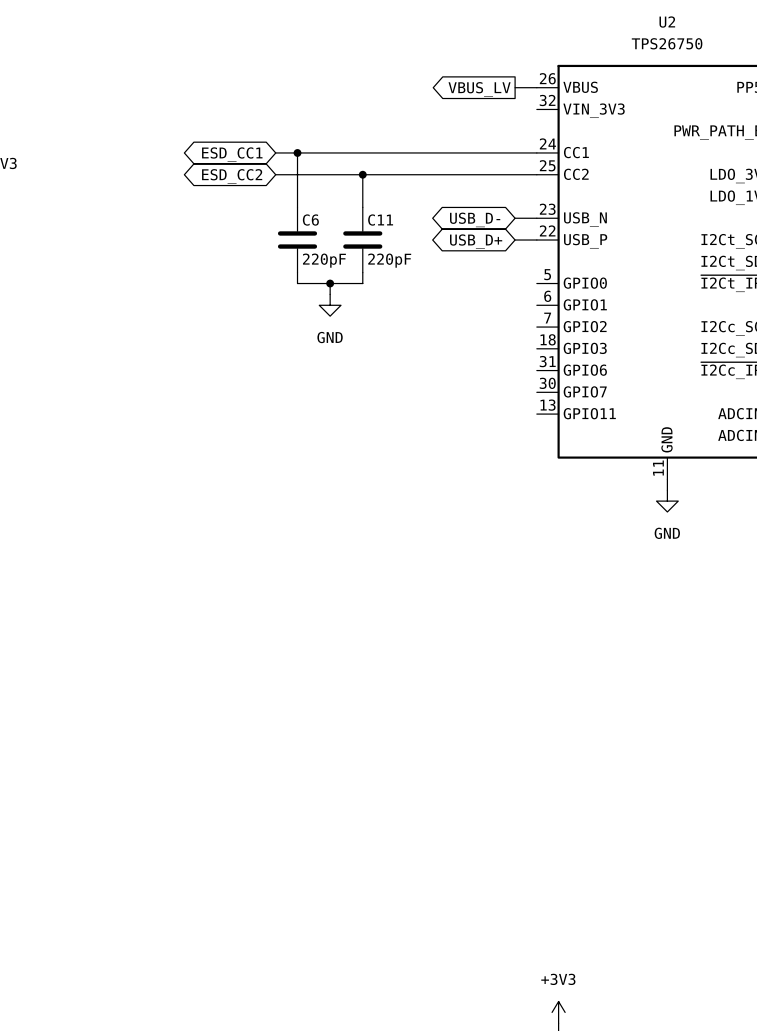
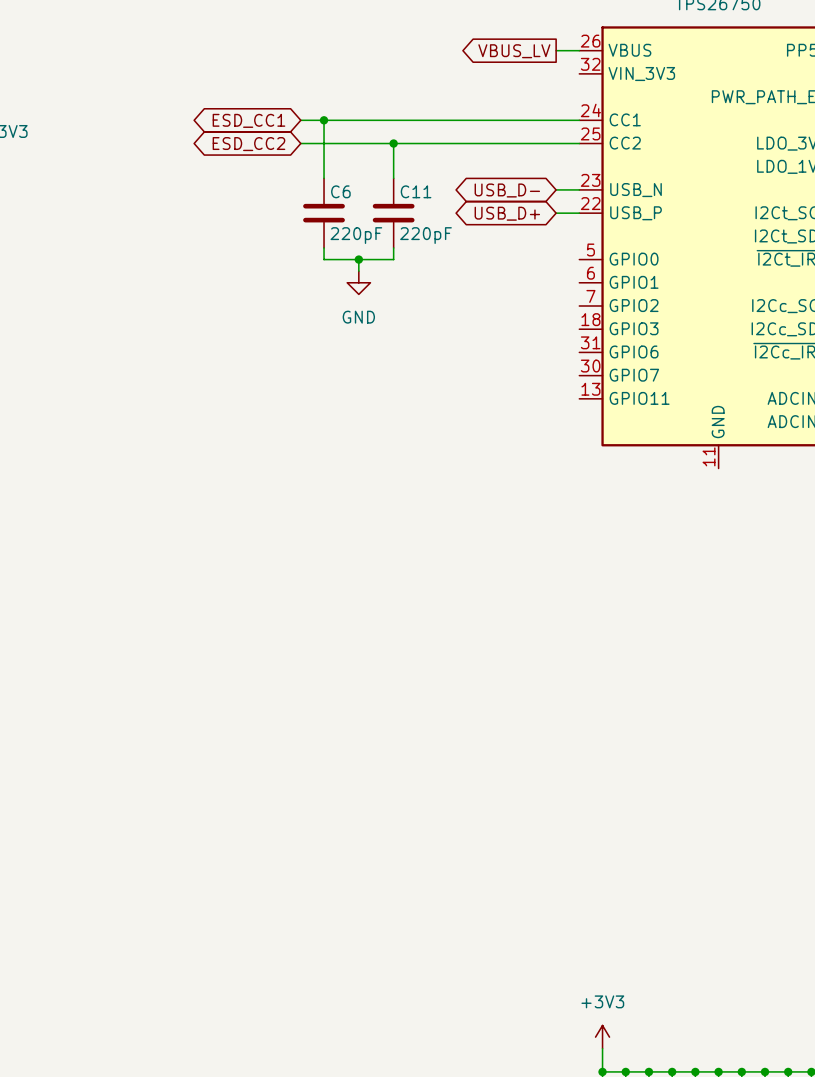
wire: (667, 479) (667, 490) -> none
power symbol: GND (667, 501) -> none

